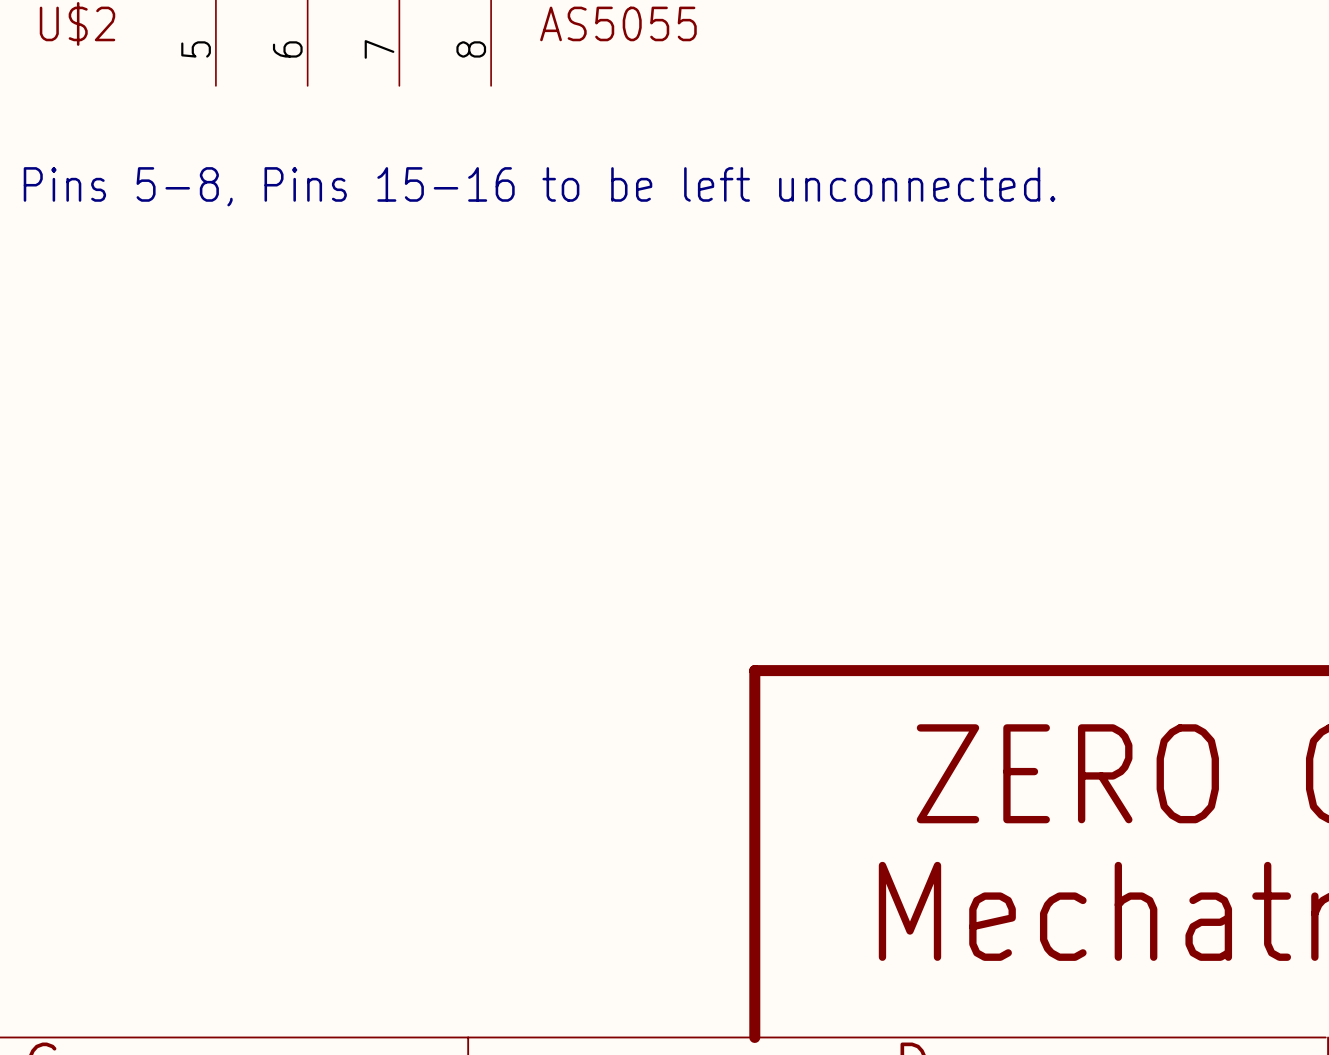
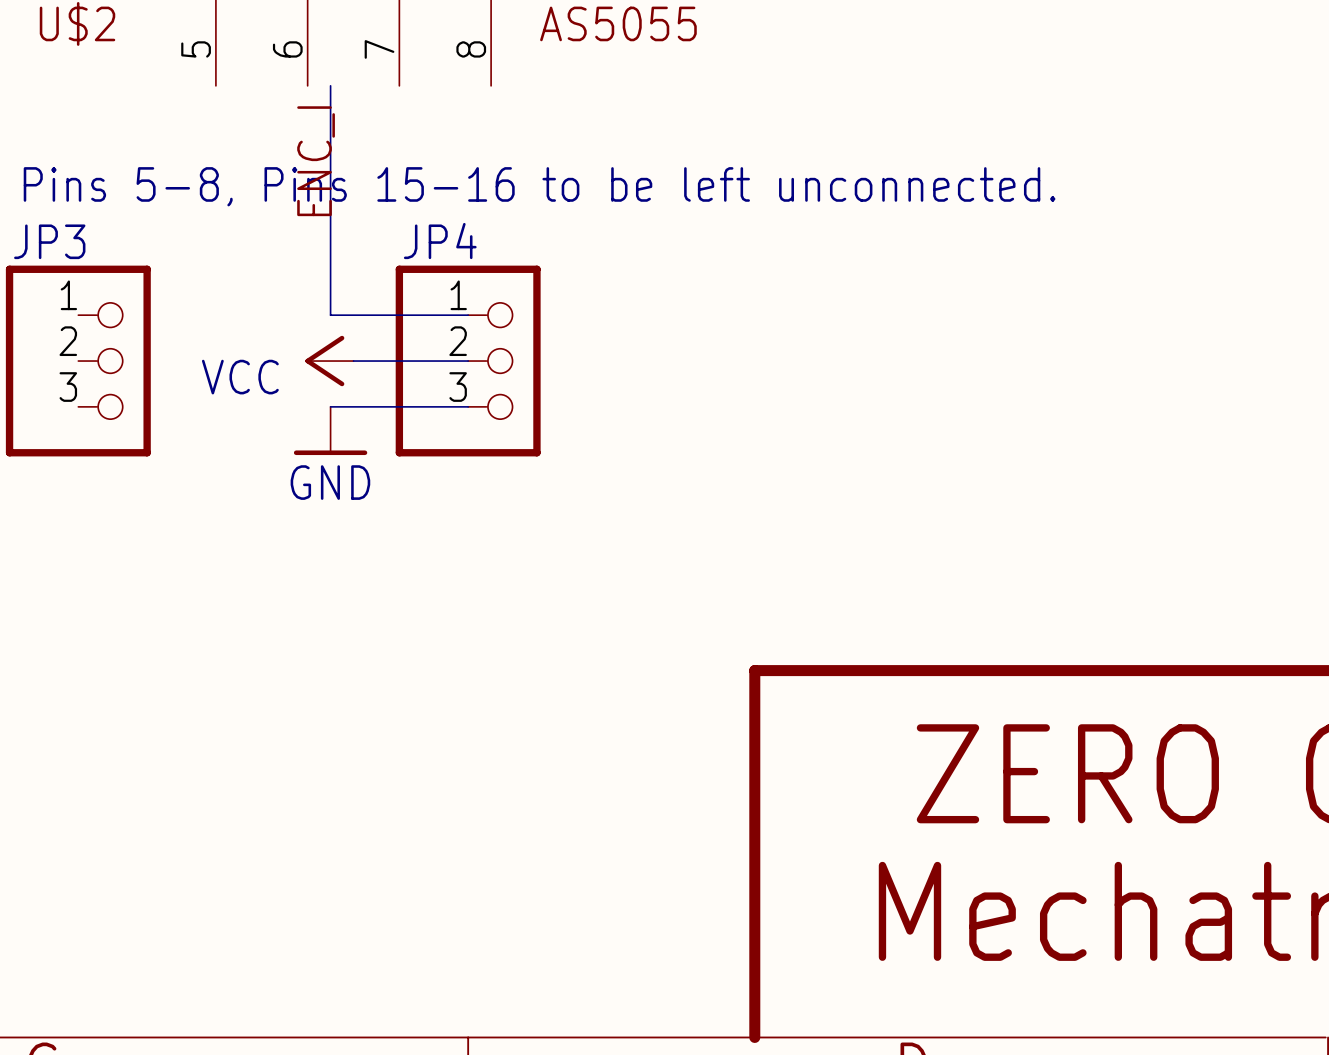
wire: none -> (330, 85) (330, 315) (468, 315)
label: none -> ENC_I (316, 161)
JP3: none -> (78, 361)
power symbol: none -> VCC (329, 361)
wire: none -> (353, 361) (468, 361)
JP4: none -> (468, 361)
wire: none -> (330, 406) (468, 406)
power symbol: none -> GND (330, 430)

